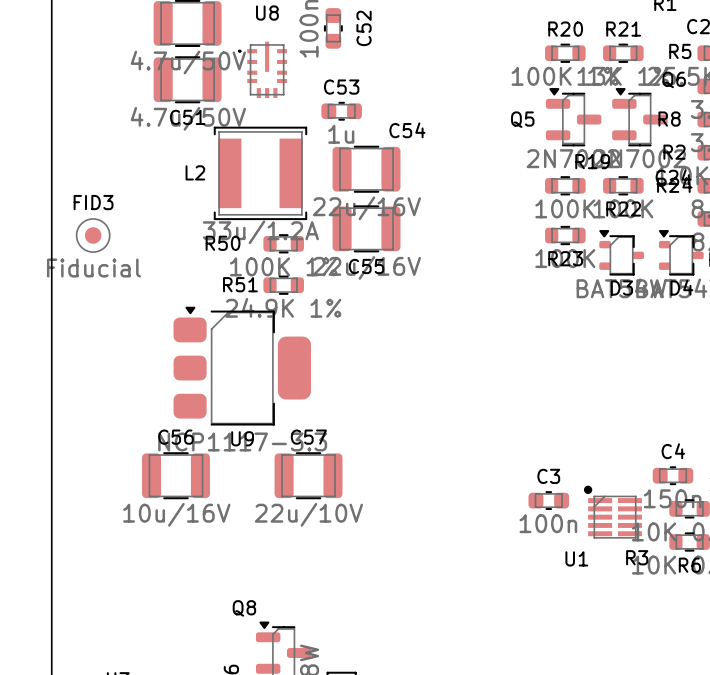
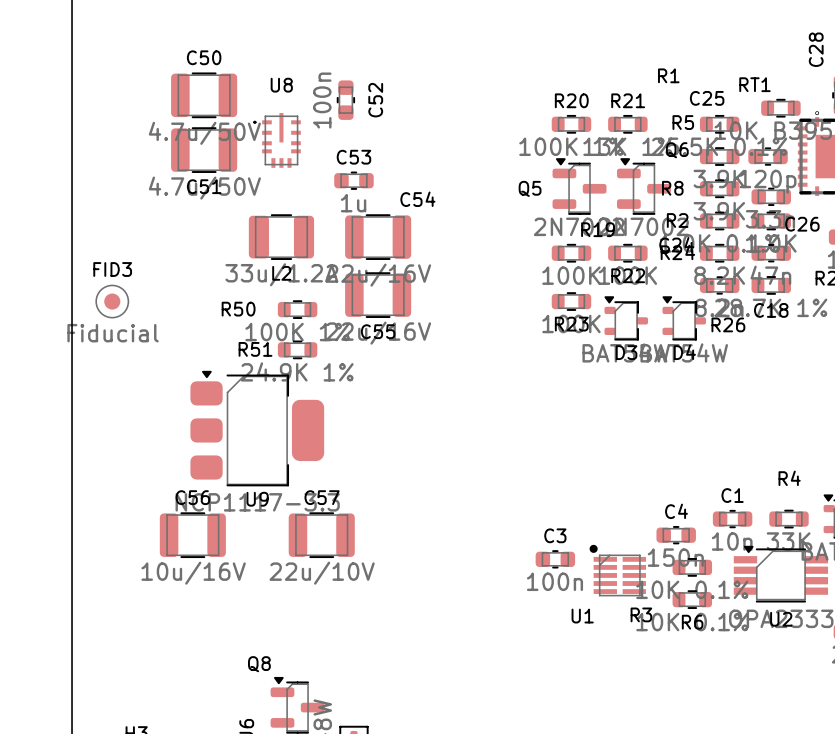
L2 footprint: [213, 126, 308, 221] -> [248, 214, 315, 260]
L2 name position: L2 (195, 172) -> L2 (281, 273)

